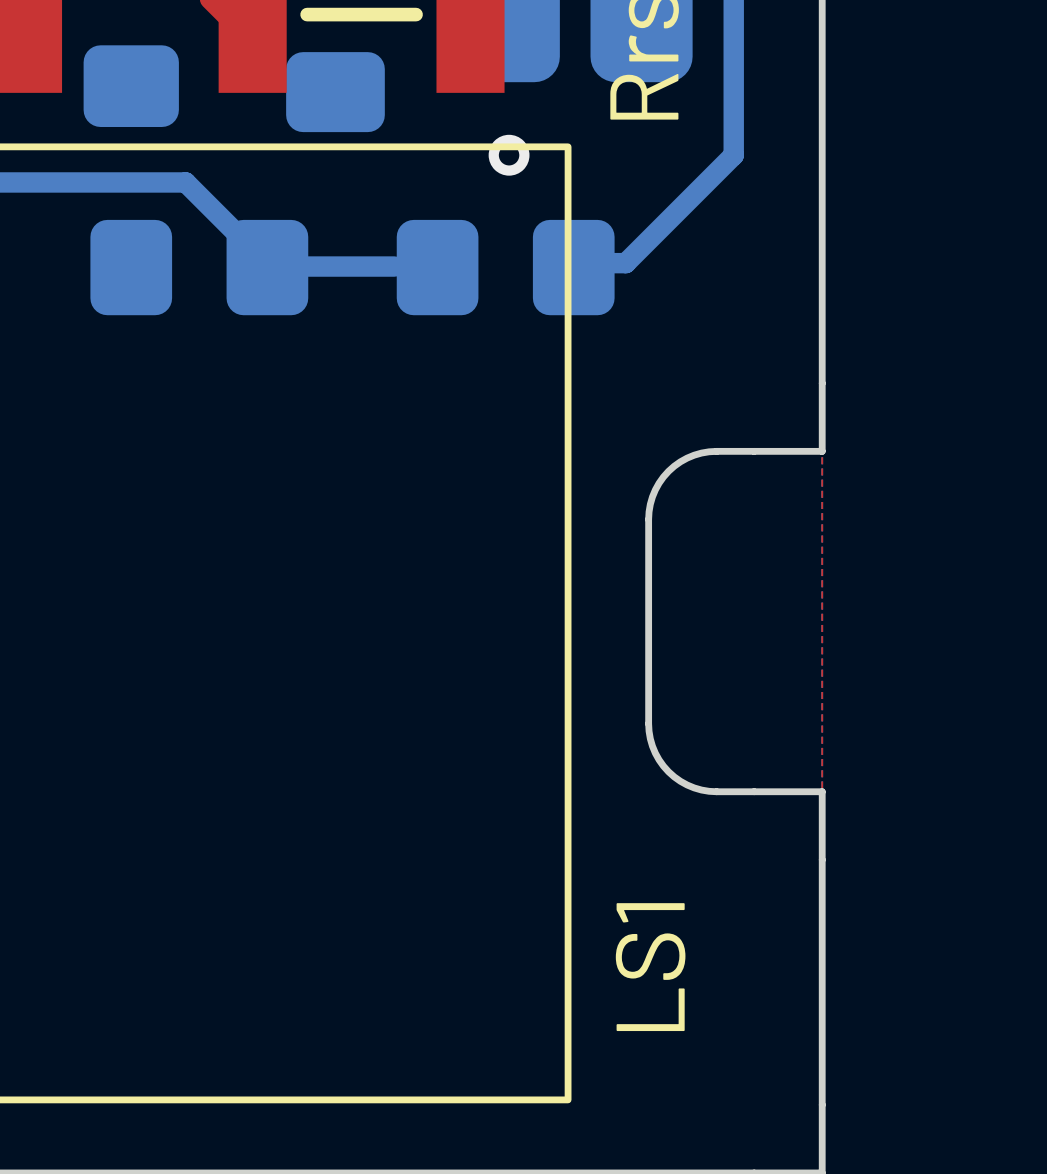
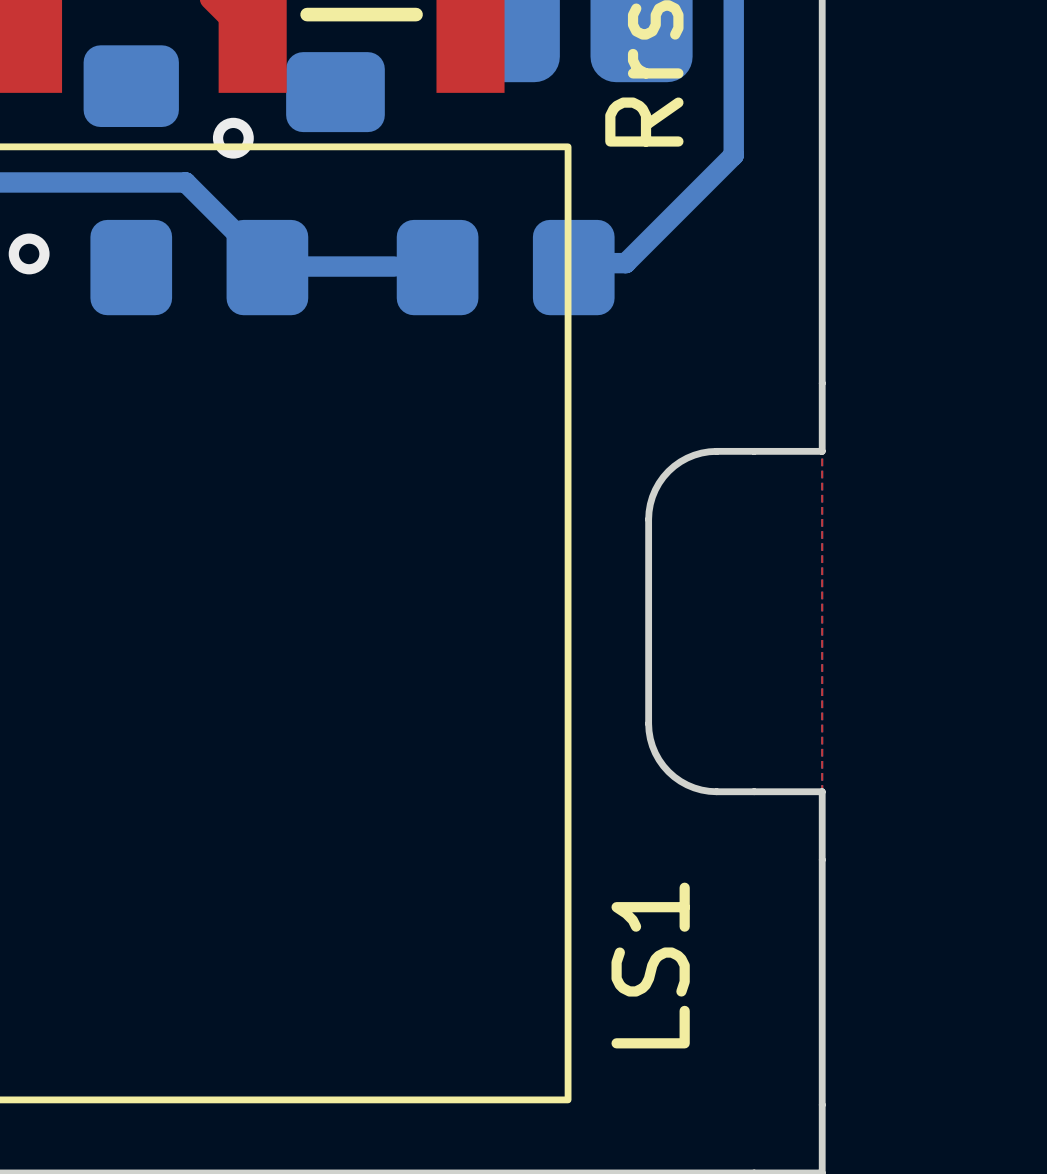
via: none -> (233, 138)
via: (509, 155) -> none
via: none -> (29, 253)

